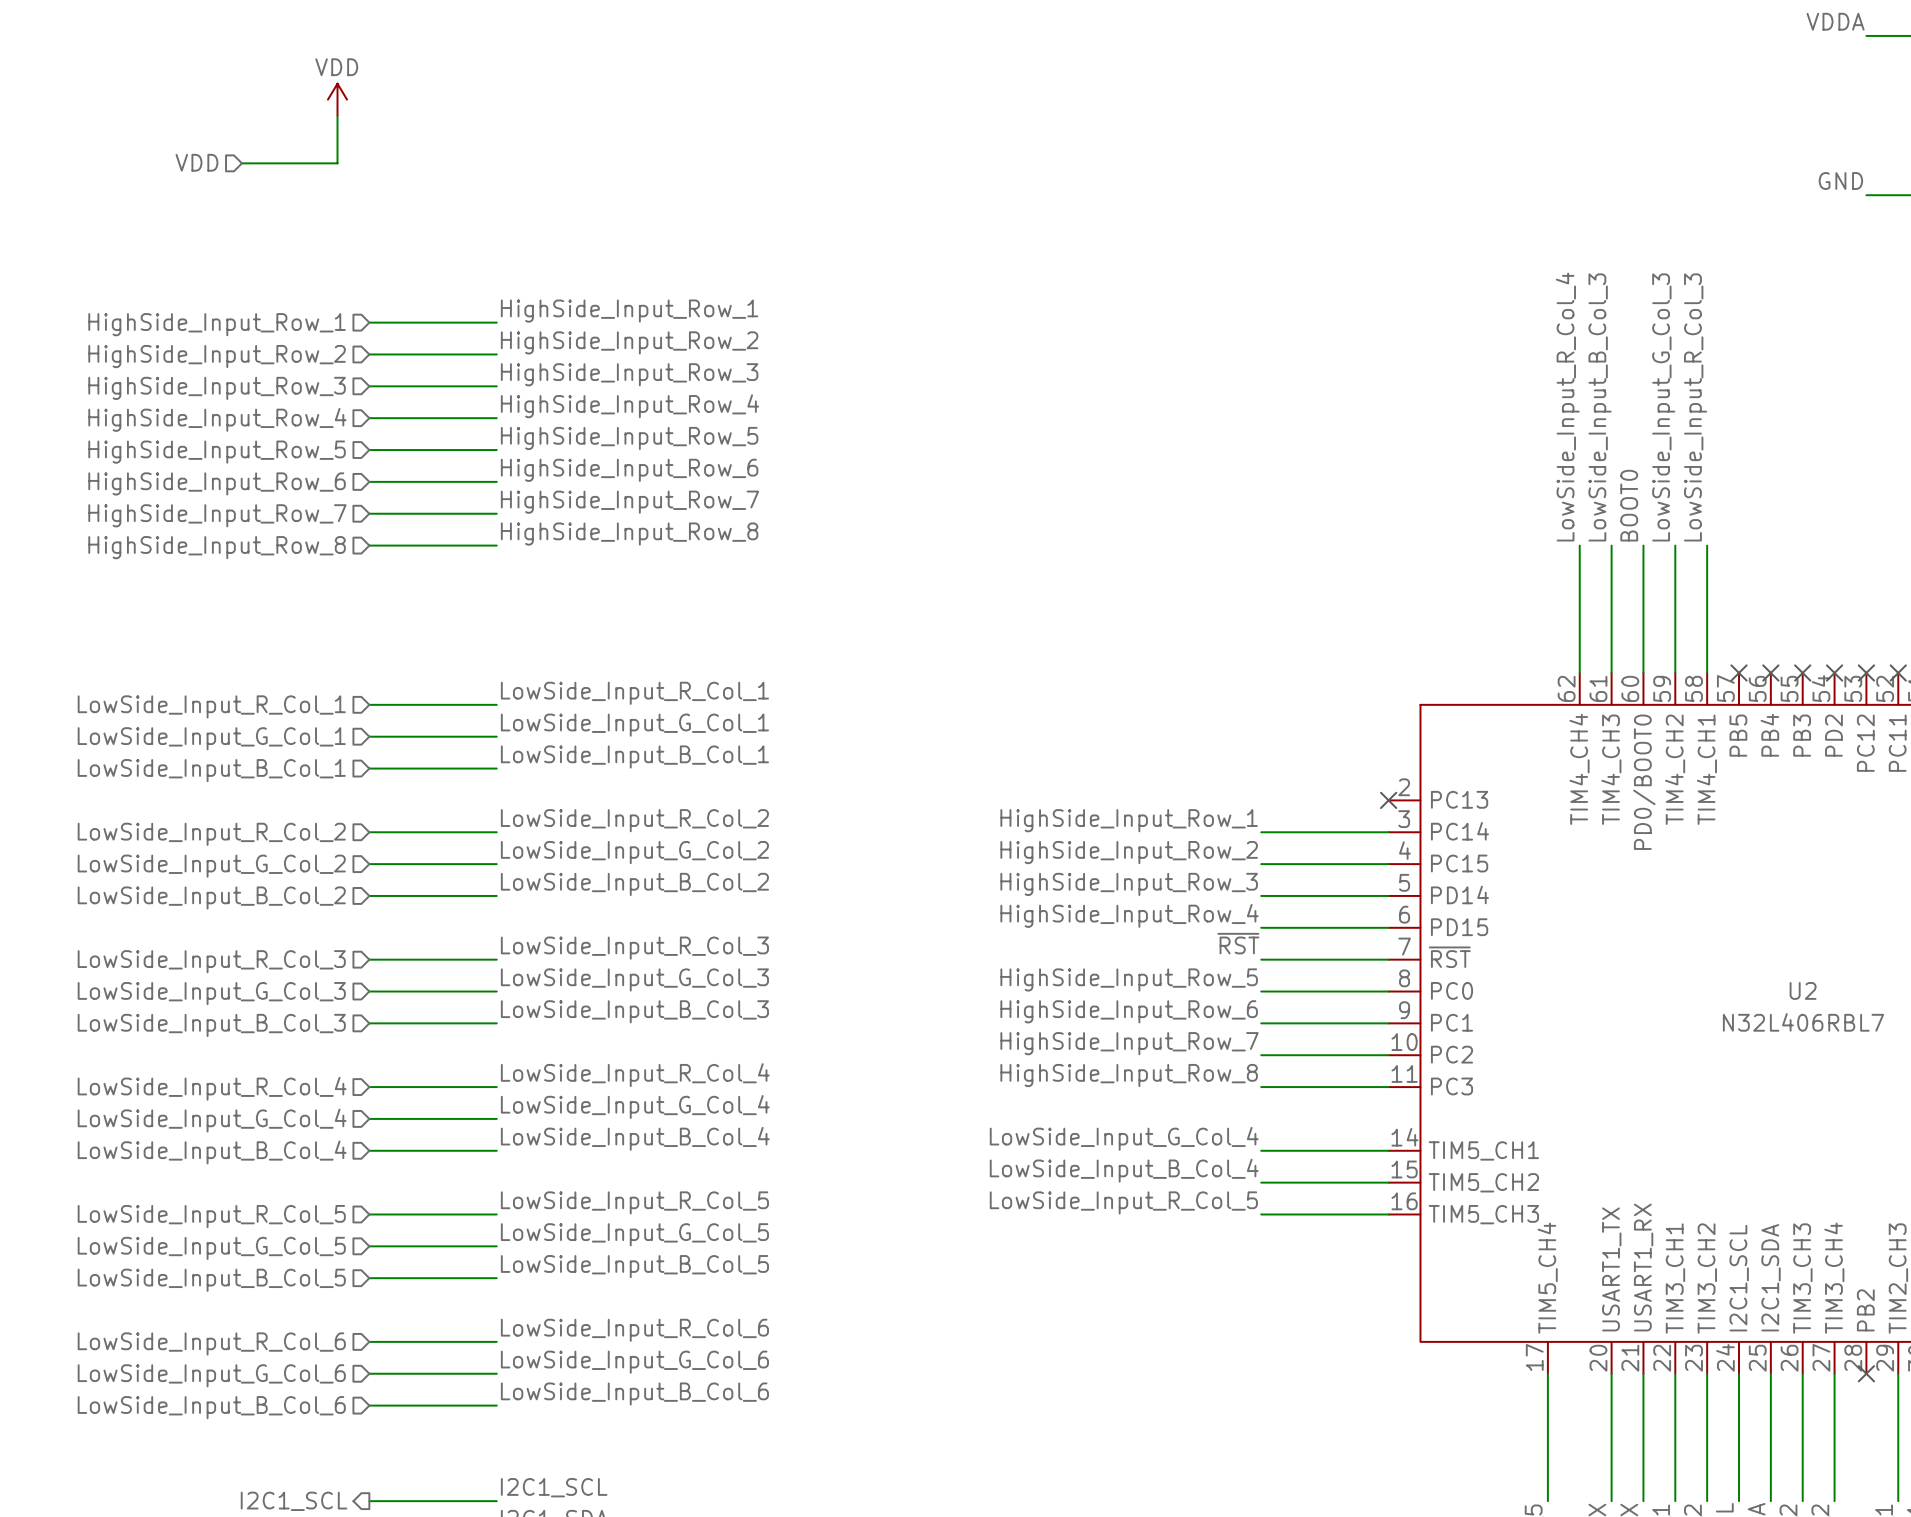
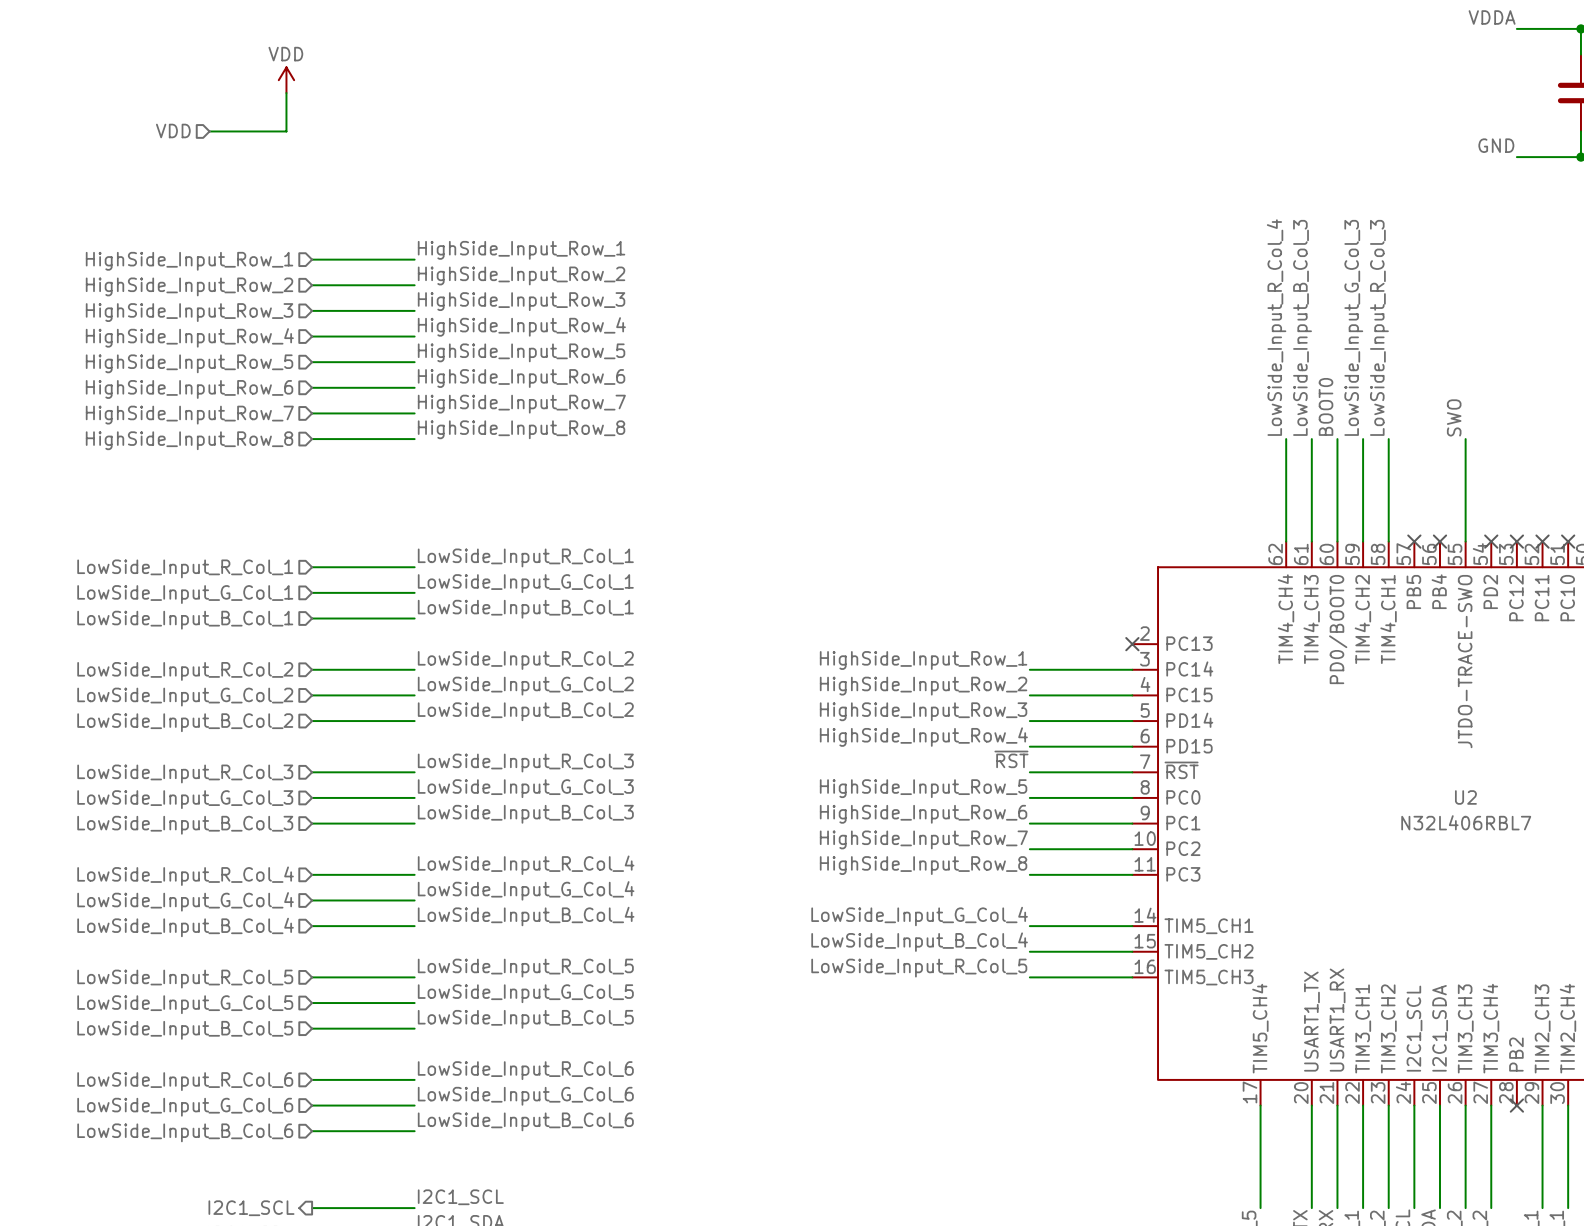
label: none -> SWO (1454, 417)
wire: none -> (1465, 439) (1465, 541)
no-connect mark: (1802, 672) -> none
U2 pin name: PB3 (1802, 735) -> JTDO-TRACE-SWO (1465, 661)

